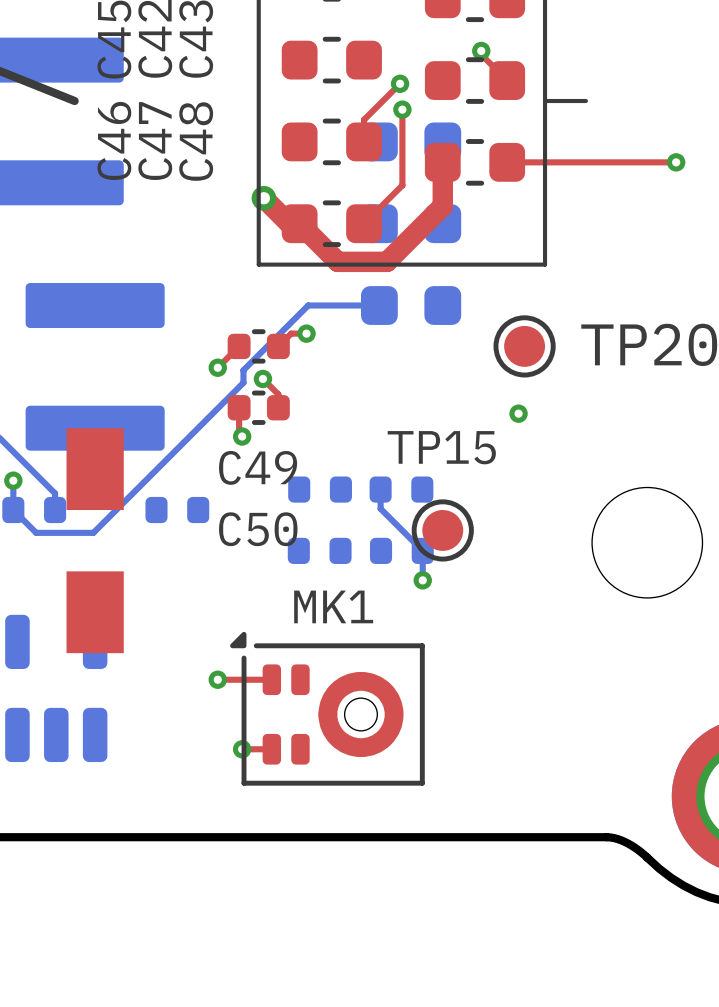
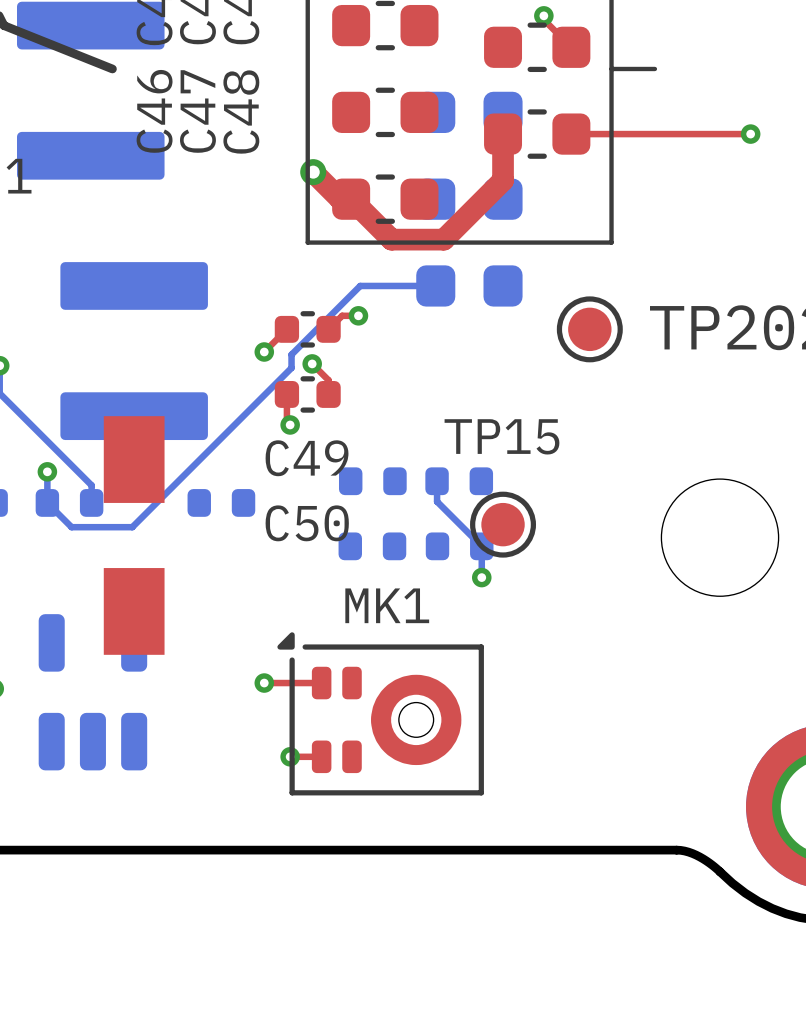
top track: (400, 83) (364, 119) (364, 141) -> none
via: (400, 83) -> none
top track: (402, 109) (402, 185) (364, 223) -> none
via: (402, 109) -> none
via: (518, 413) -> none

